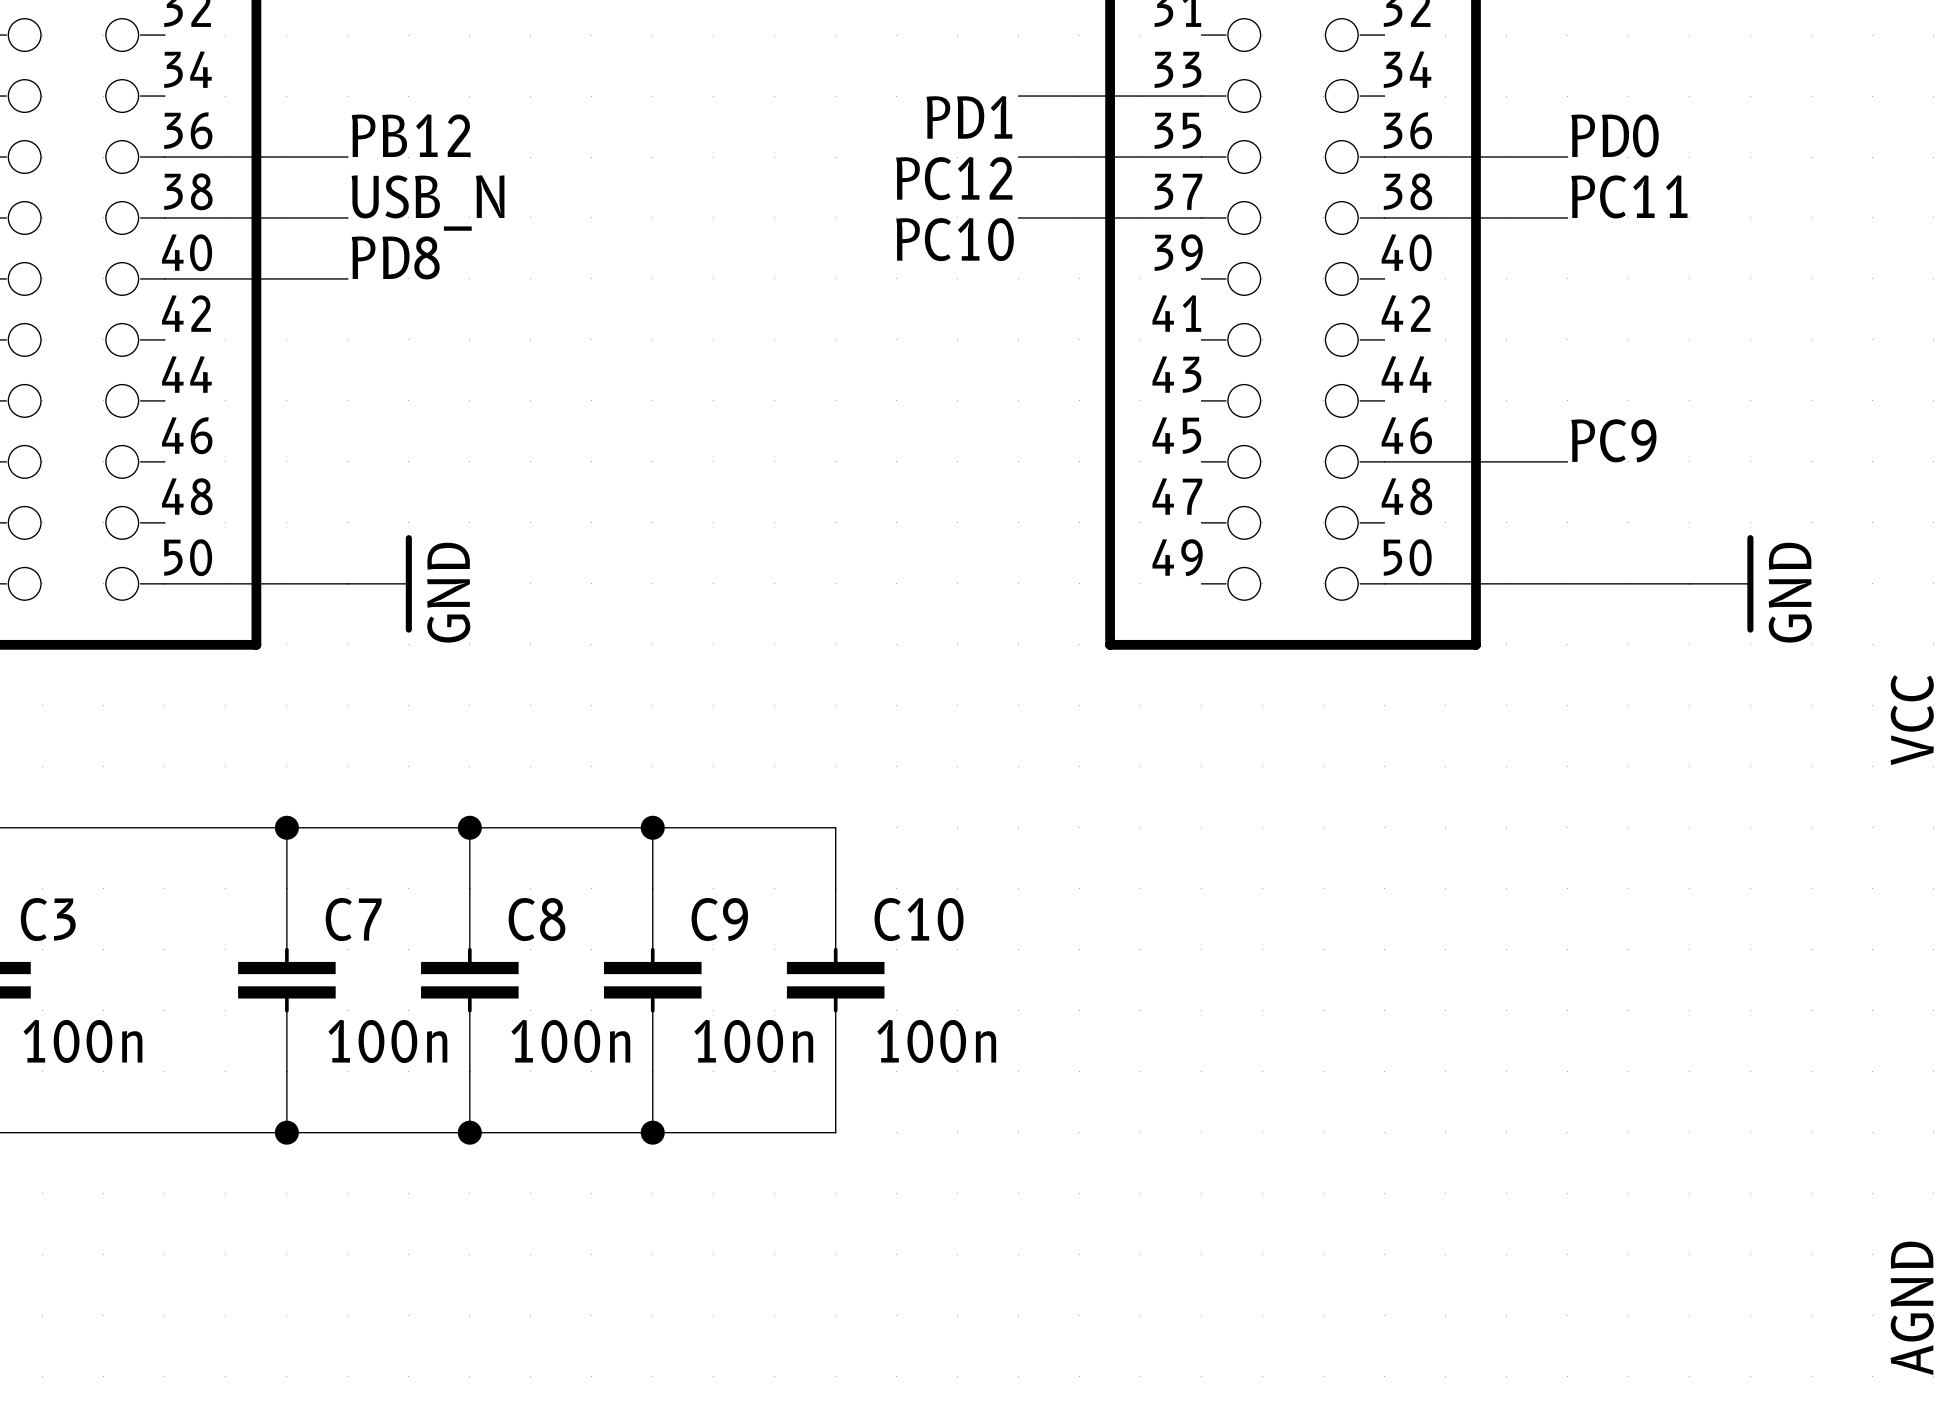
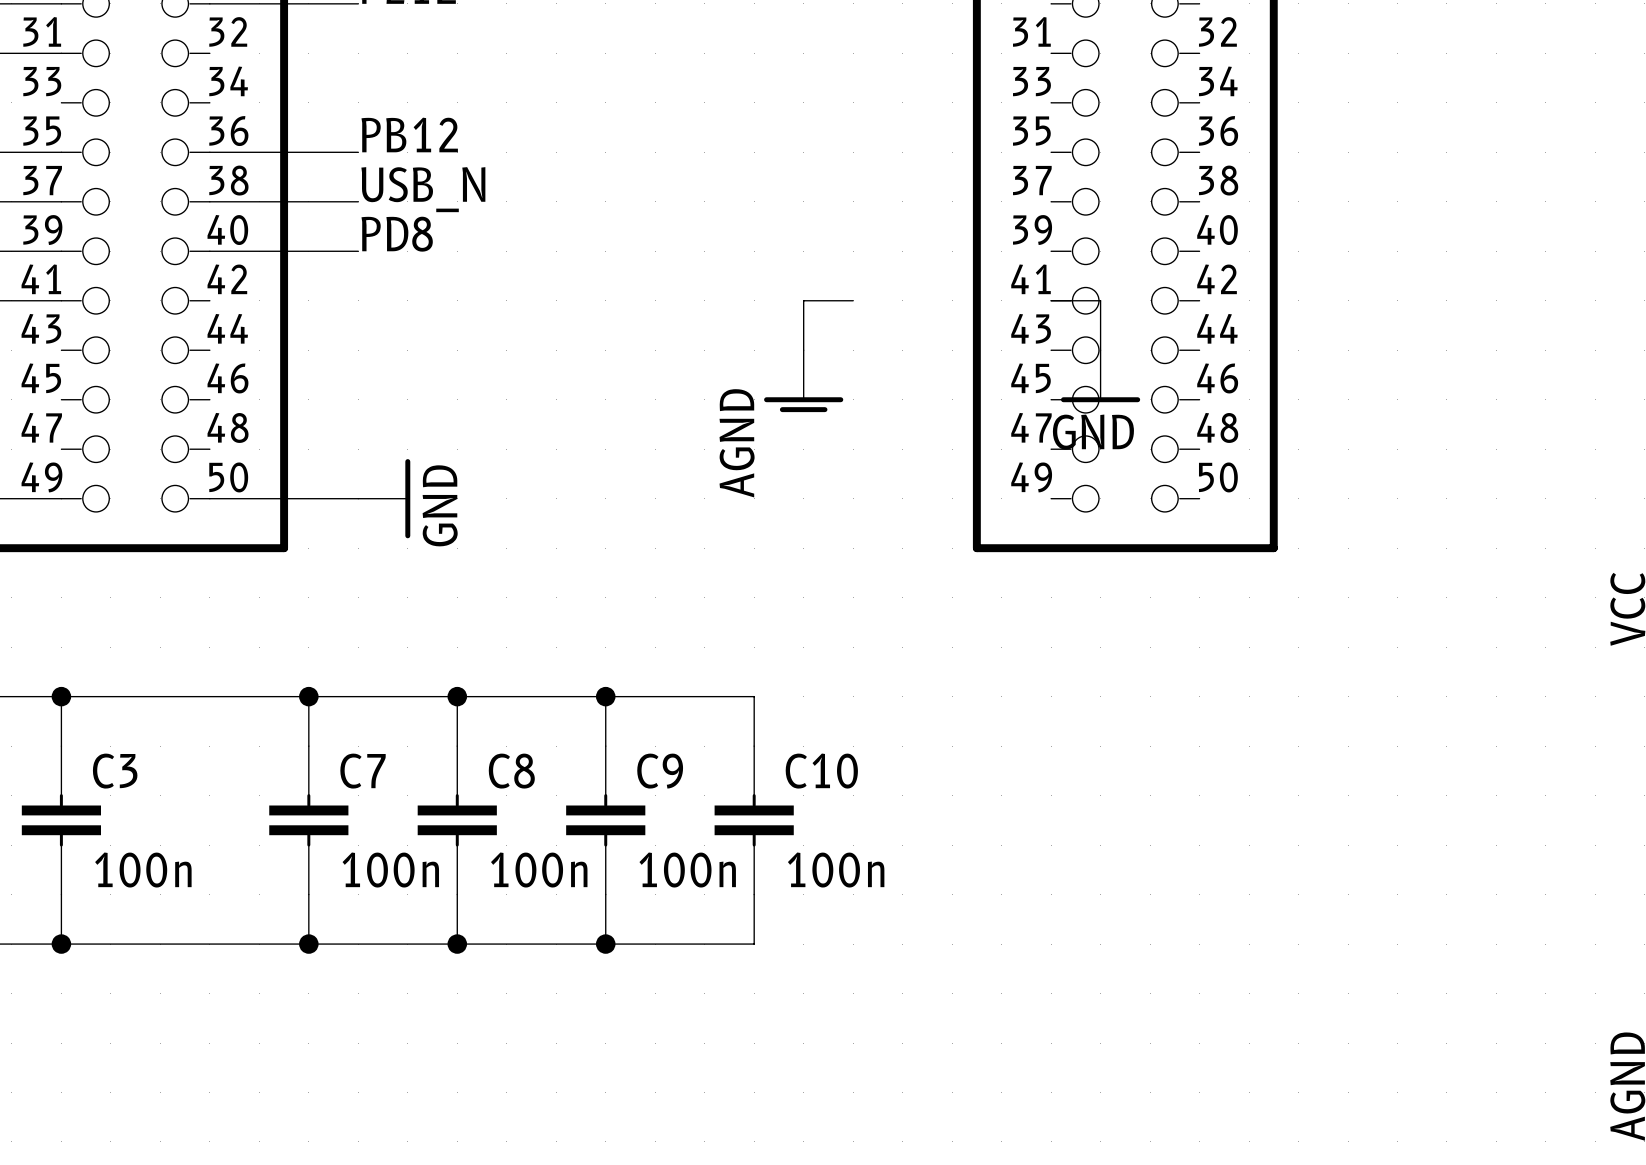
wire: (1018, 96) (1201, 96) -> none
label: PD1 (969, 117) -> none
label: PD0 (1615, 135) -> none
wire: (1018, 157) (1201, 157) -> none
wire: (1384, 157) (1567, 157) -> none
label: PC12 (954, 178) -> none
label: PC11 (1629, 196) -> none
wire: (1018, 217) (1201, 217) -> none
wire: (1384, 217) (1567, 217) -> none
label: PC10 (955, 239) -> none
wire: none -> (853, 300) (803, 300) (803, 350)
wire: none -> (1051, 300) (1100, 300) (1100, 350)
power symbol: none -> AGND (803, 381)
label: PC9 (1613, 440) -> none
wire: (1384, 461) (1567, 461) -> none
wire: (1384, 583) (1689, 583) -> none
power symbol position: GND (1721, 583) -> GND (1100, 376)
power symbol rotation: 0° (1750, 583) -> 90° clockwise (1100, 399)

